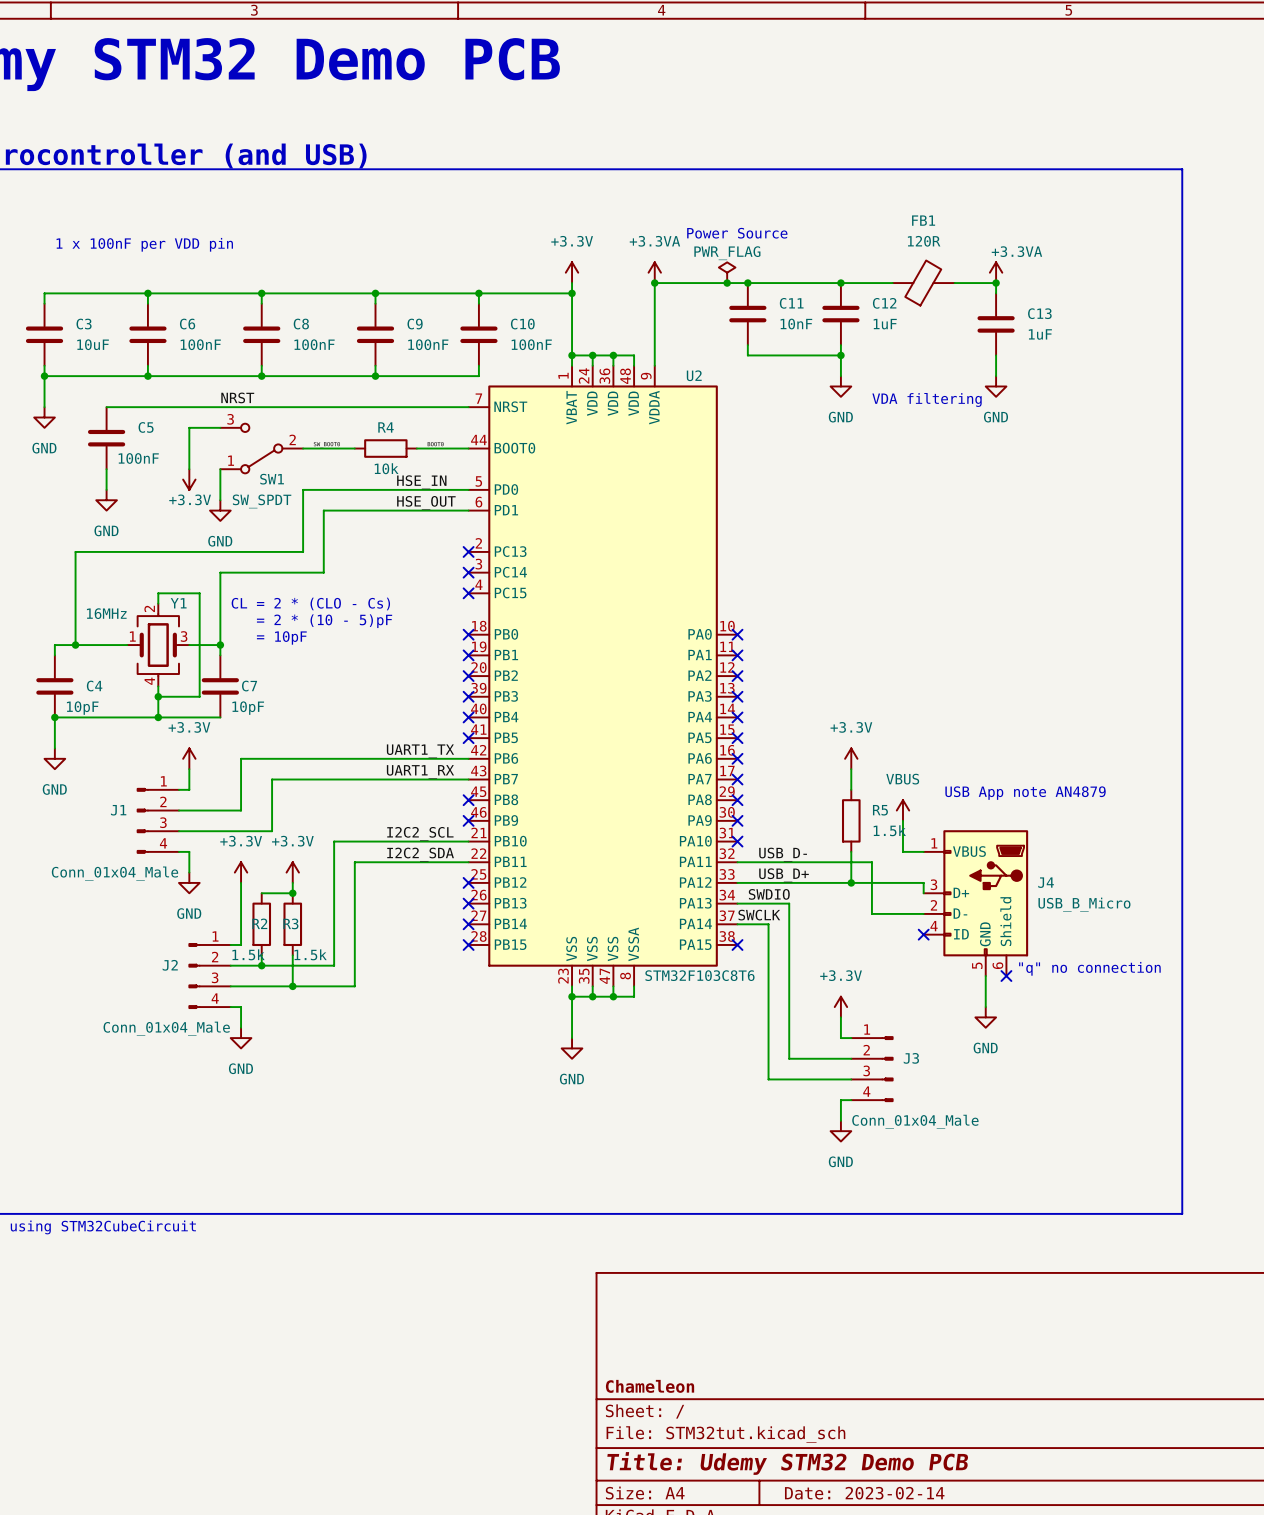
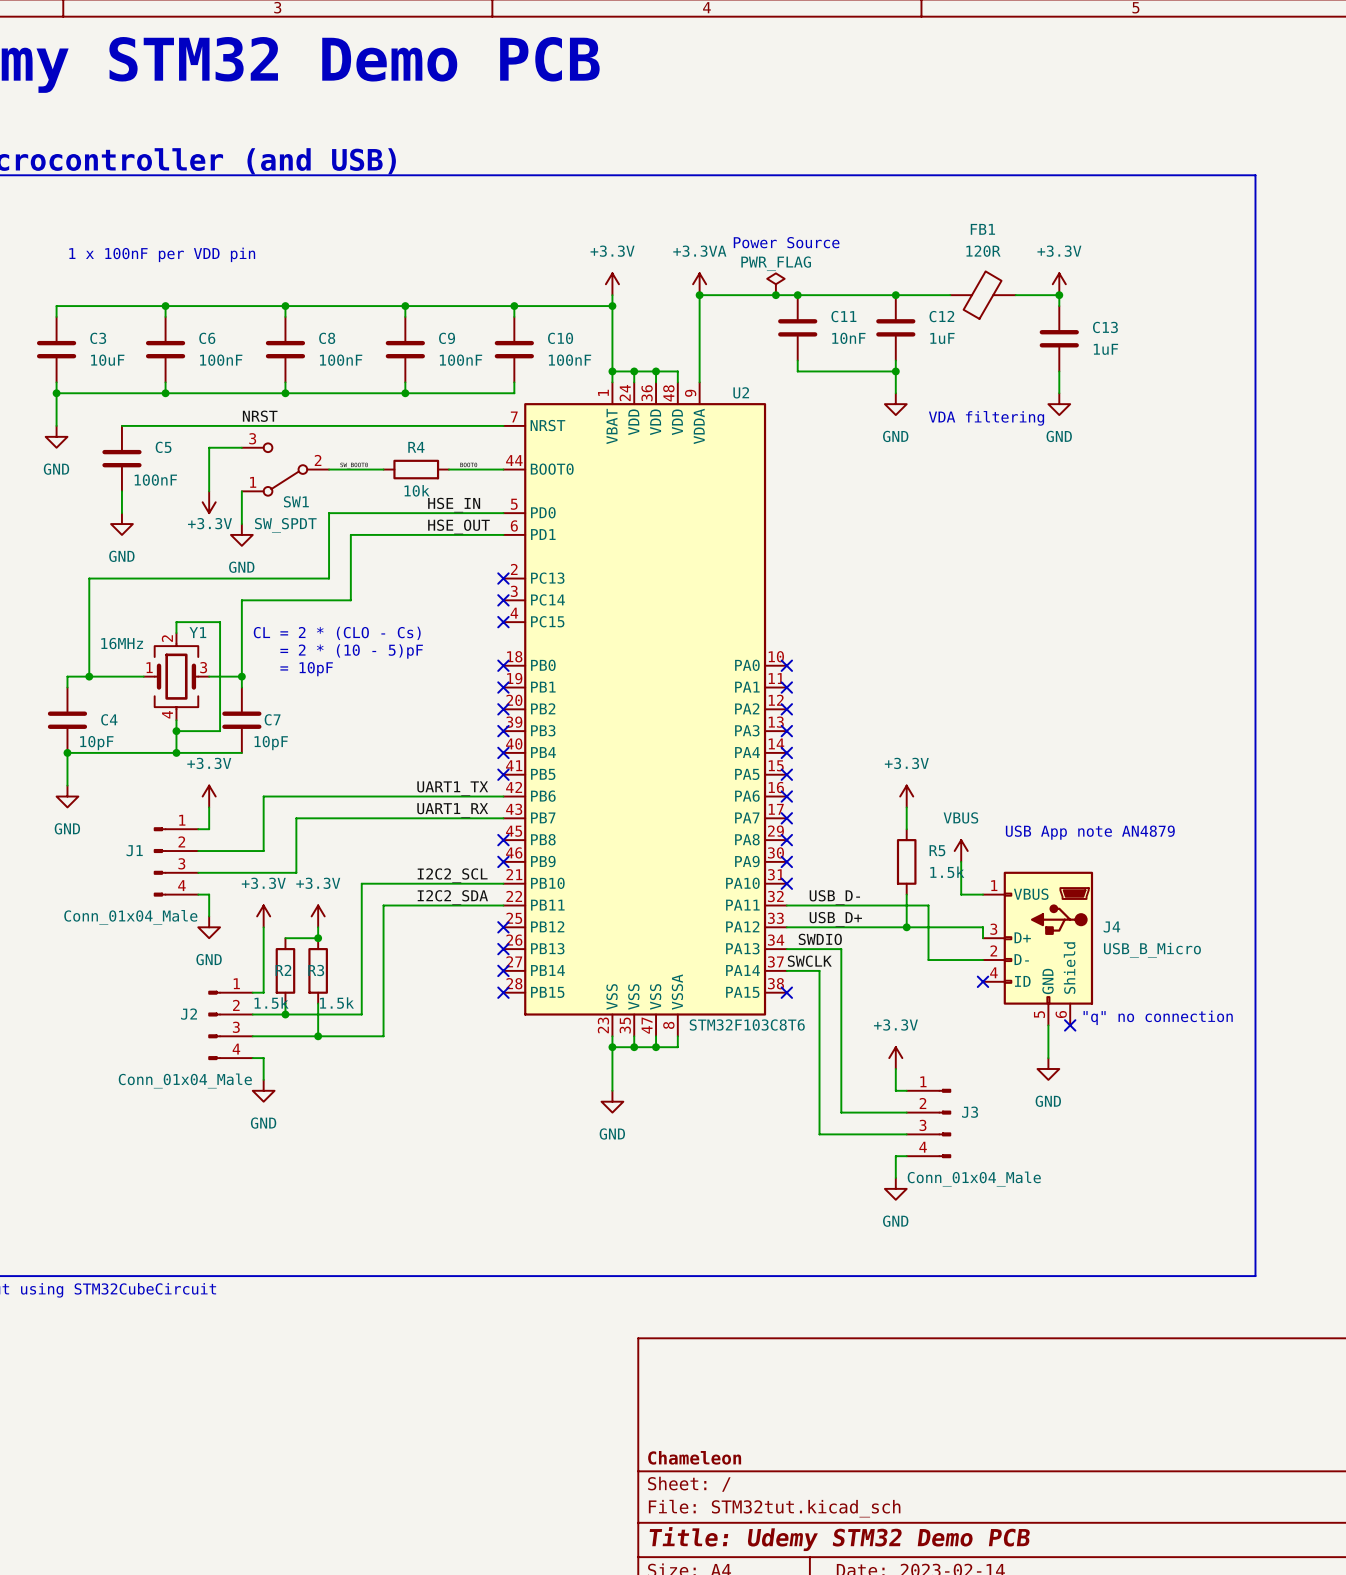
power symbol: +3.3VA (996, 272) -> +3.3V (1059, 284)

